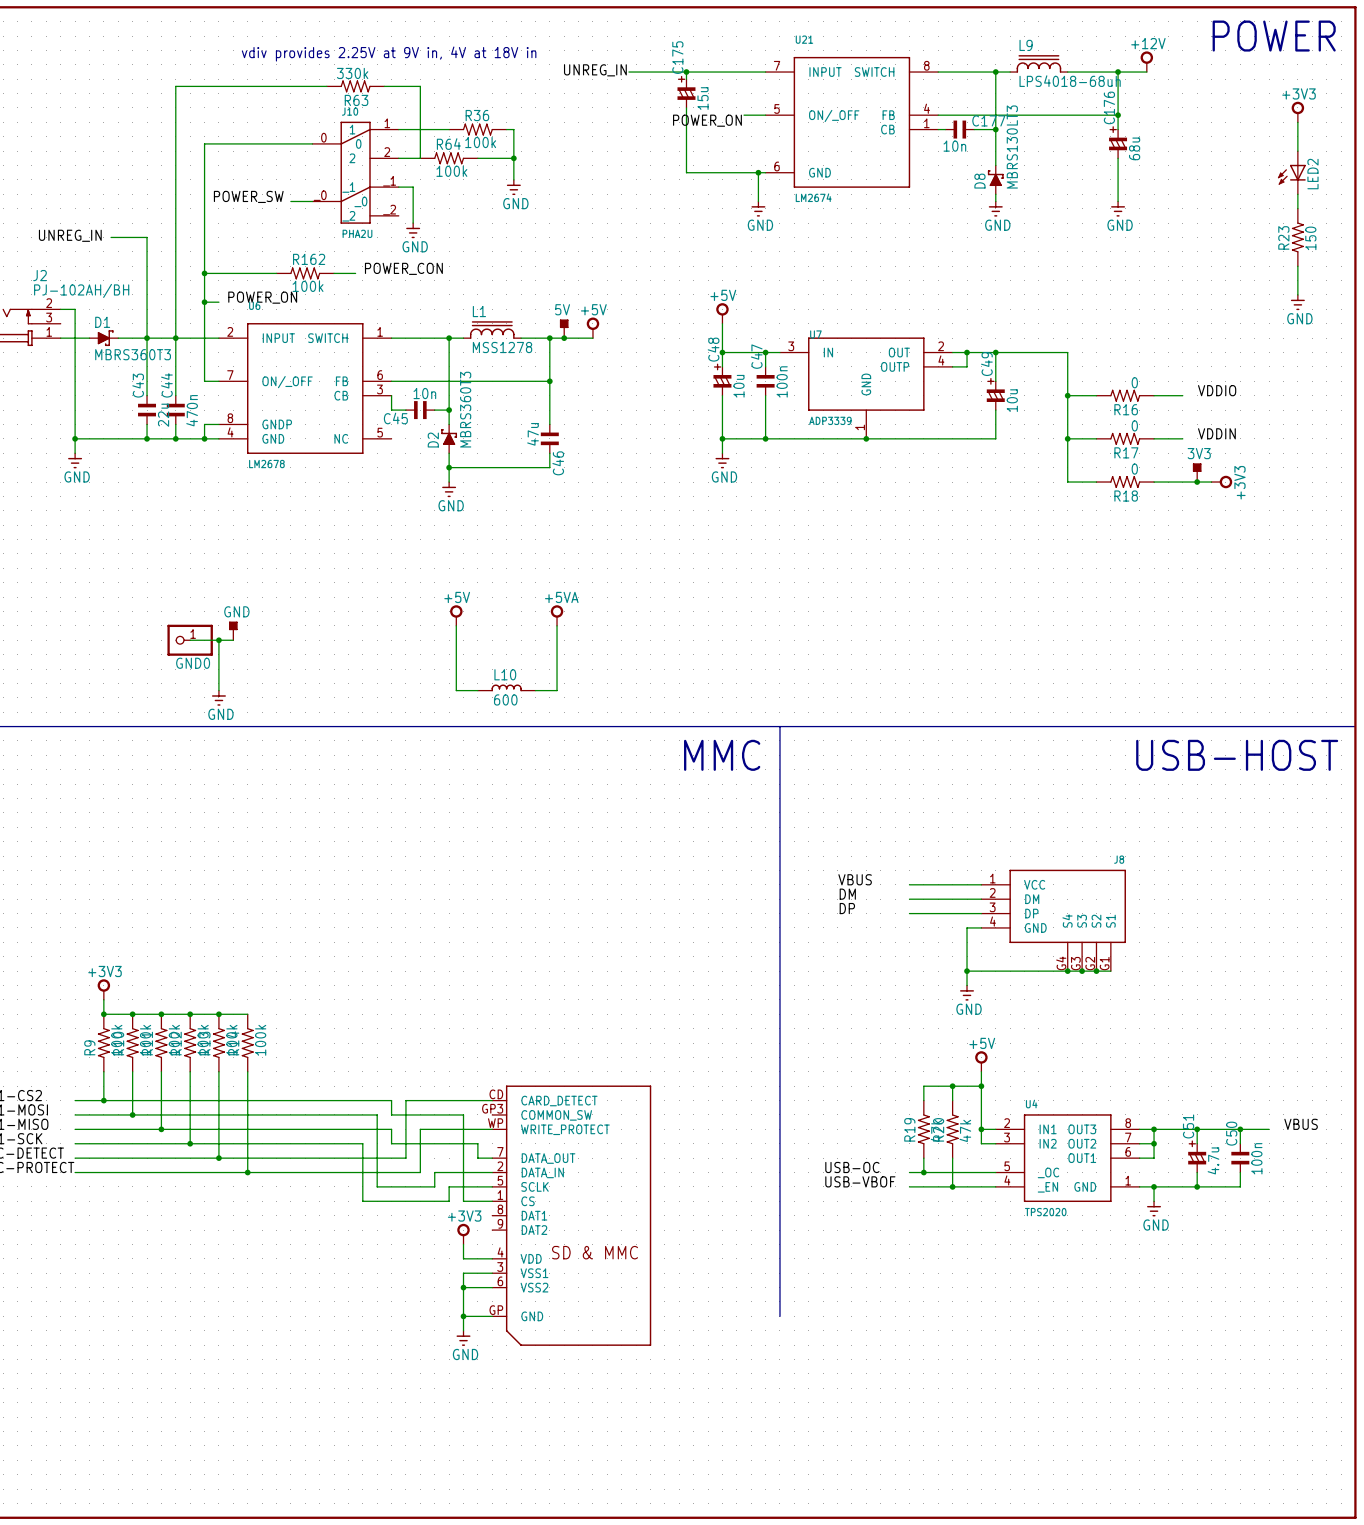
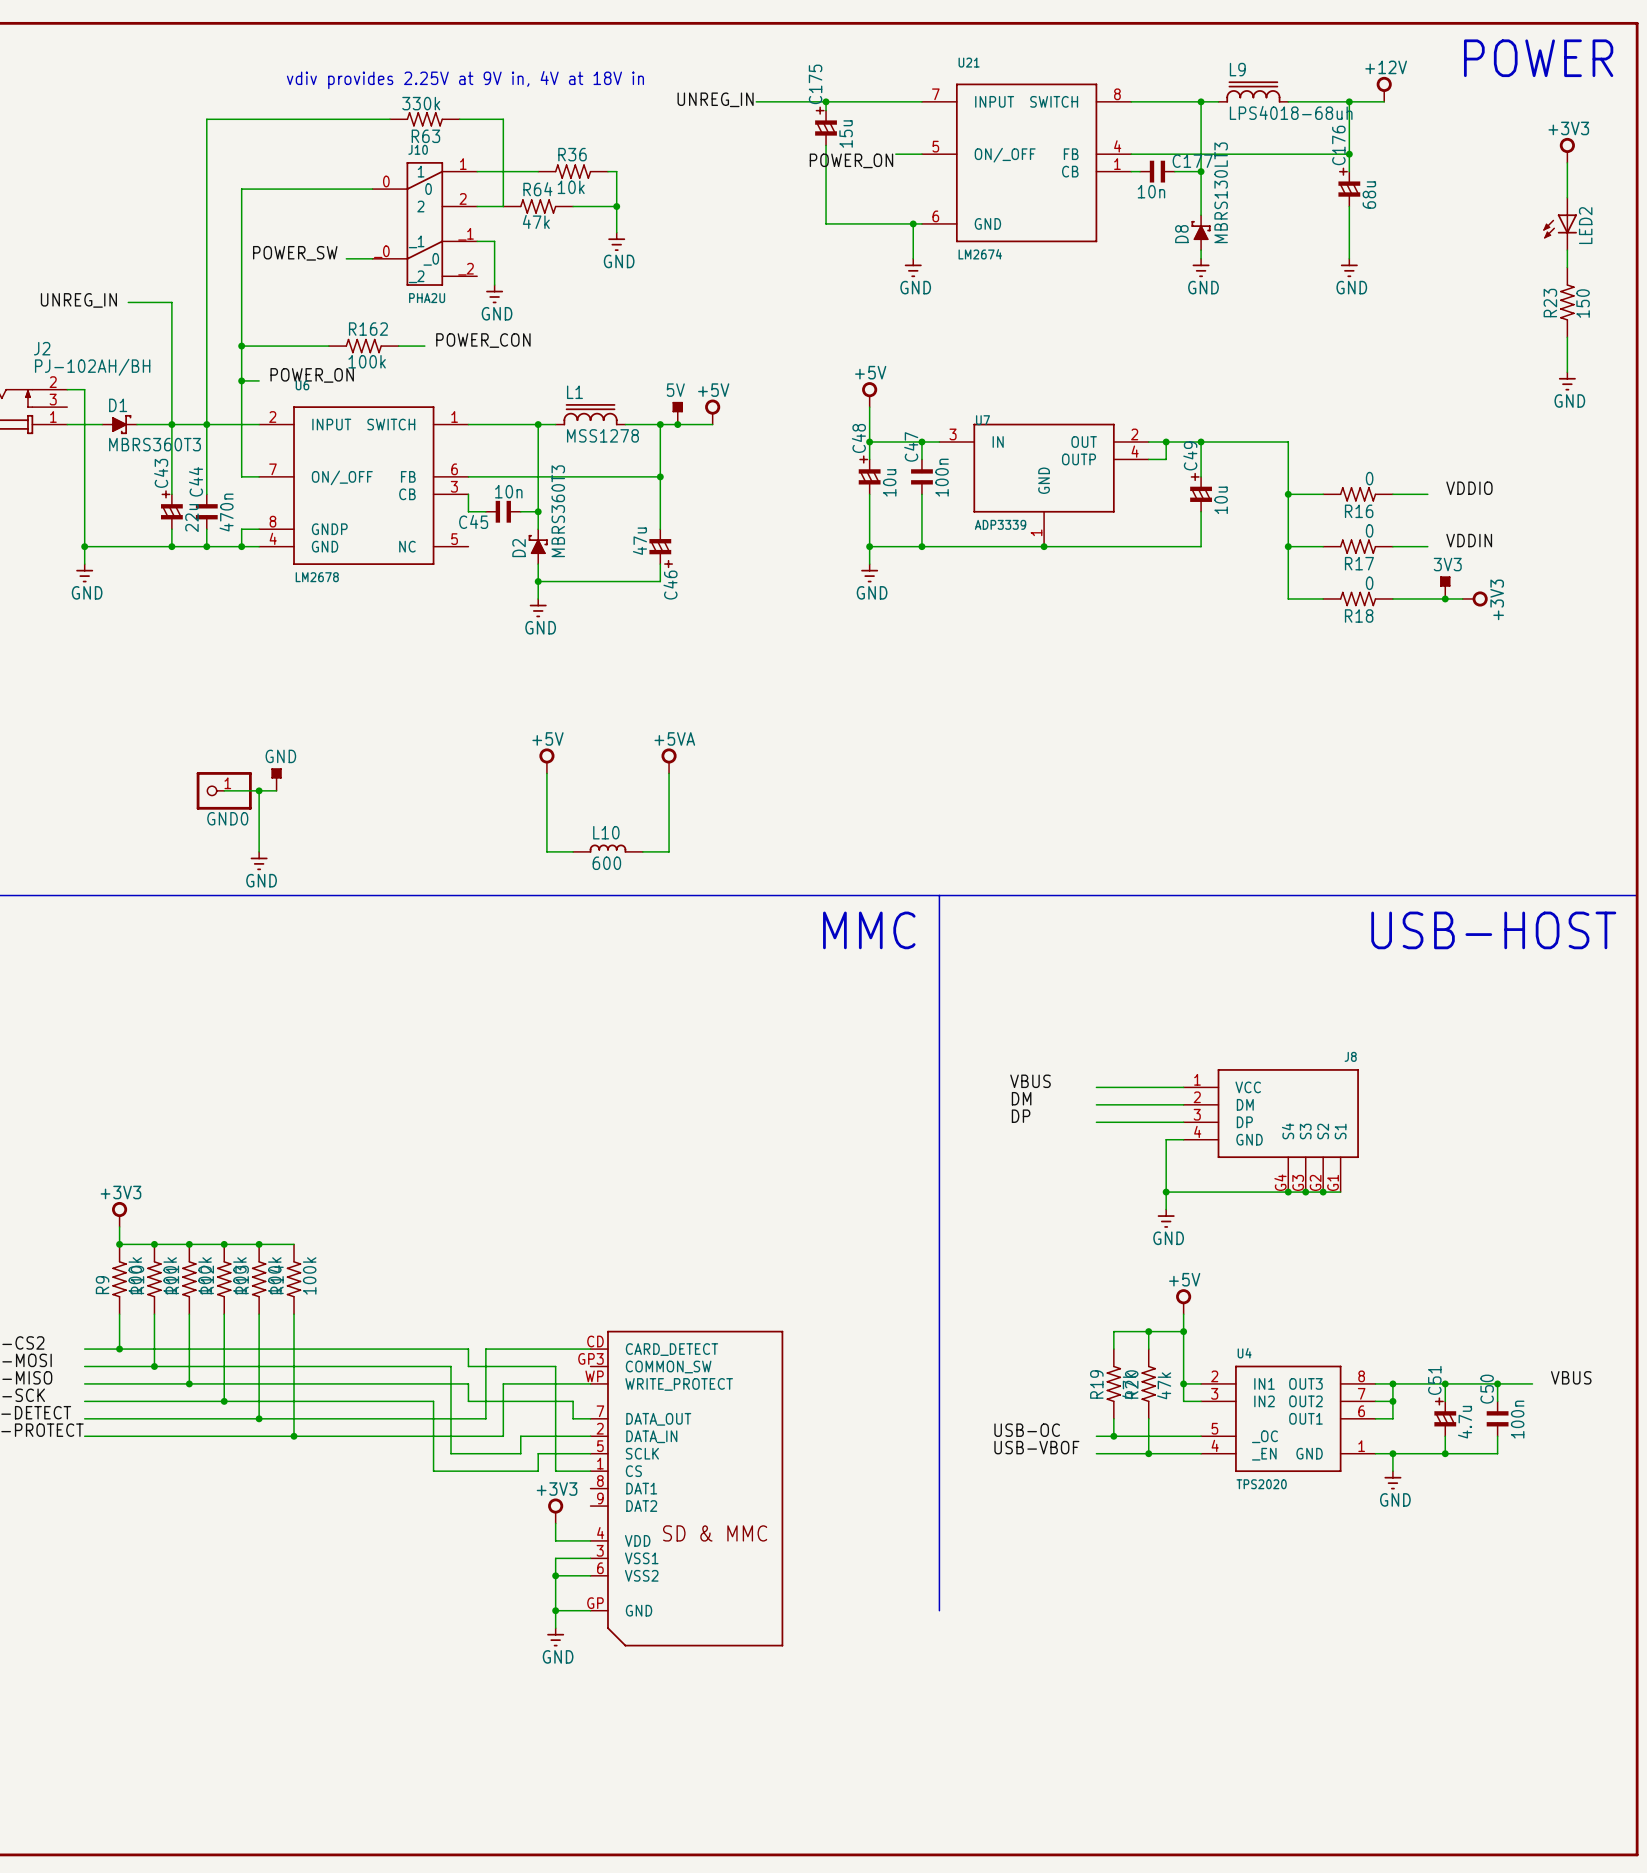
R36 value: 100k (480, 142) -> 10k (571, 187)
R64 value: 100k (451, 171) -> 47k (536, 221)
C43 symbol: [138, 395, 157, 425] -> [161, 493, 183, 530]
C46 symbol: [540, 424, 559, 454] -> [649, 528, 672, 565]

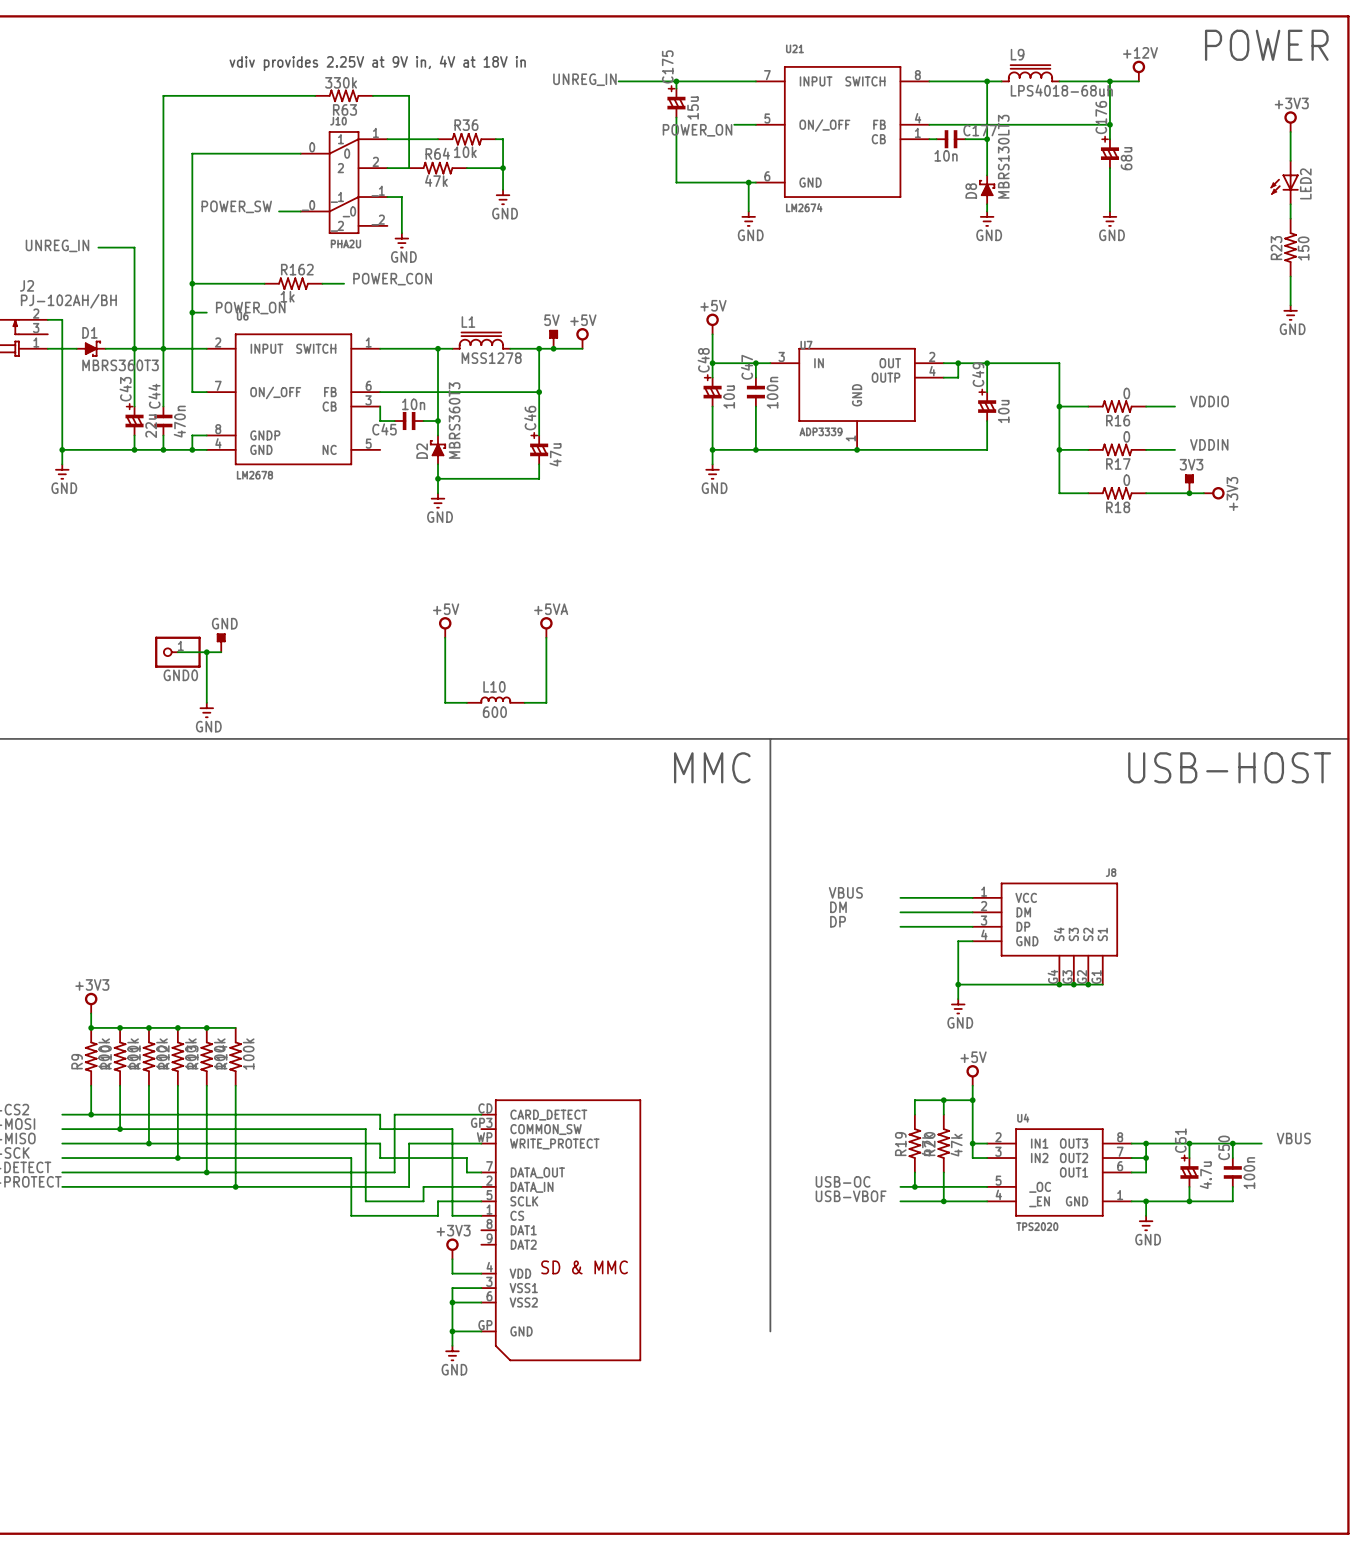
R162 value: 100k (367, 361) -> 1k (287, 296)
C46 symbol: [649, 528, 672, 565] -> [530, 435, 549, 465]
C46 value position: 47u (639, 541) -> 47u (555, 454)
C46 name position: C46 (670, 585) -> C46 (530, 418)

